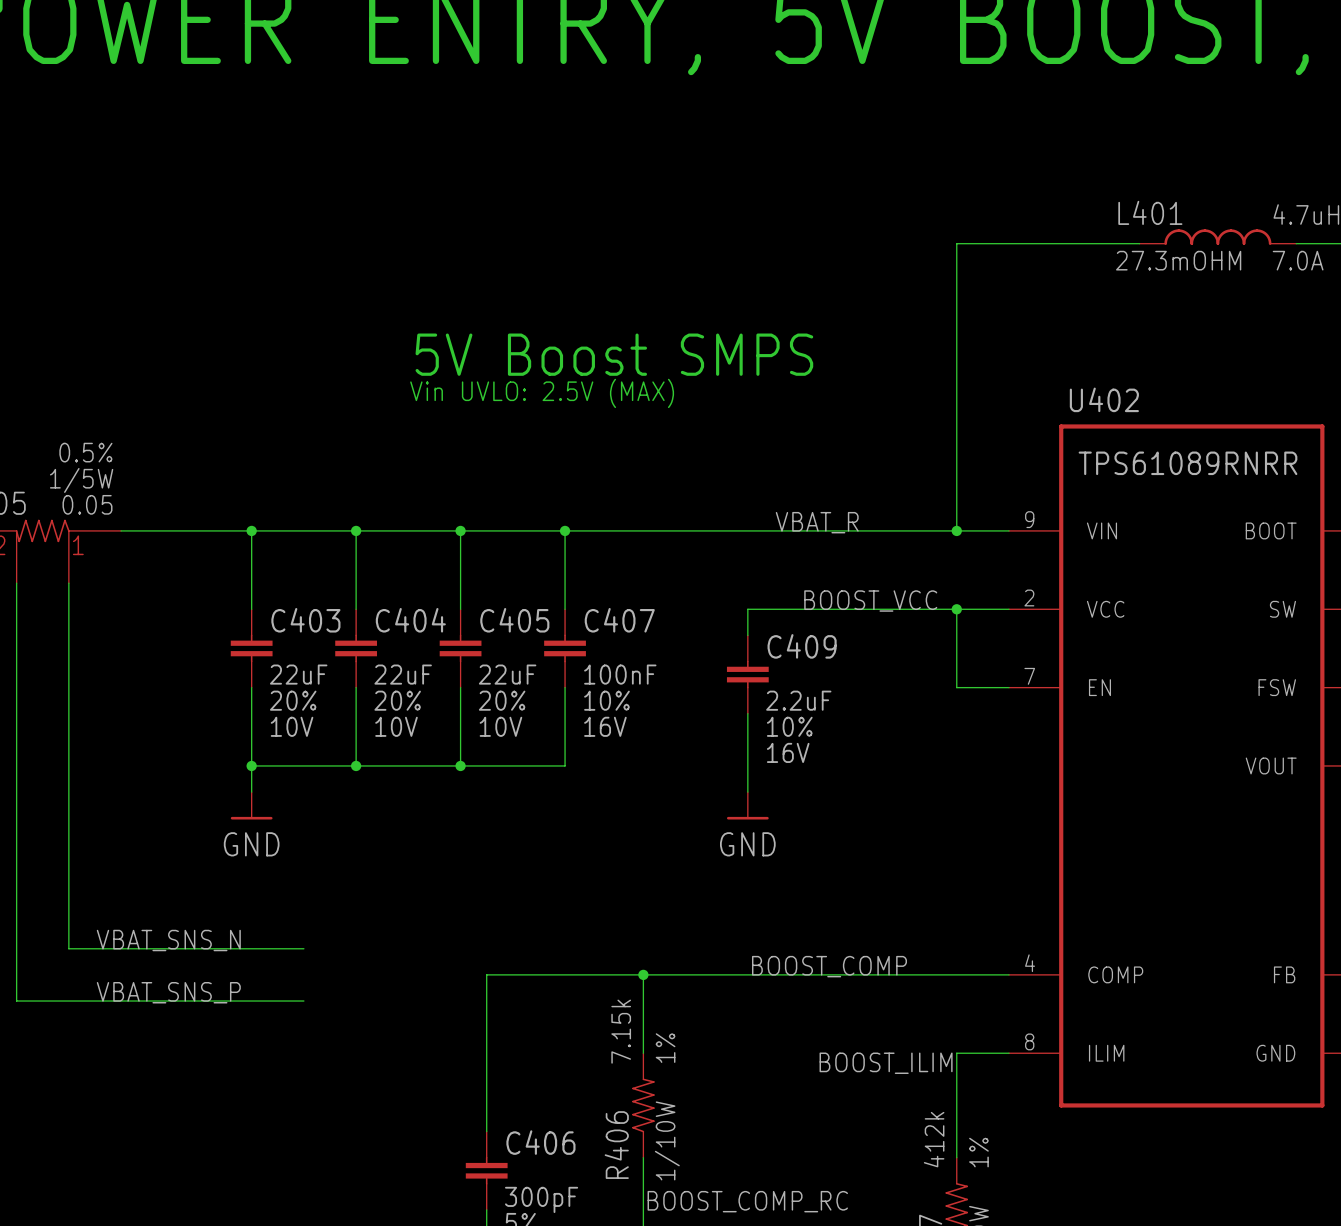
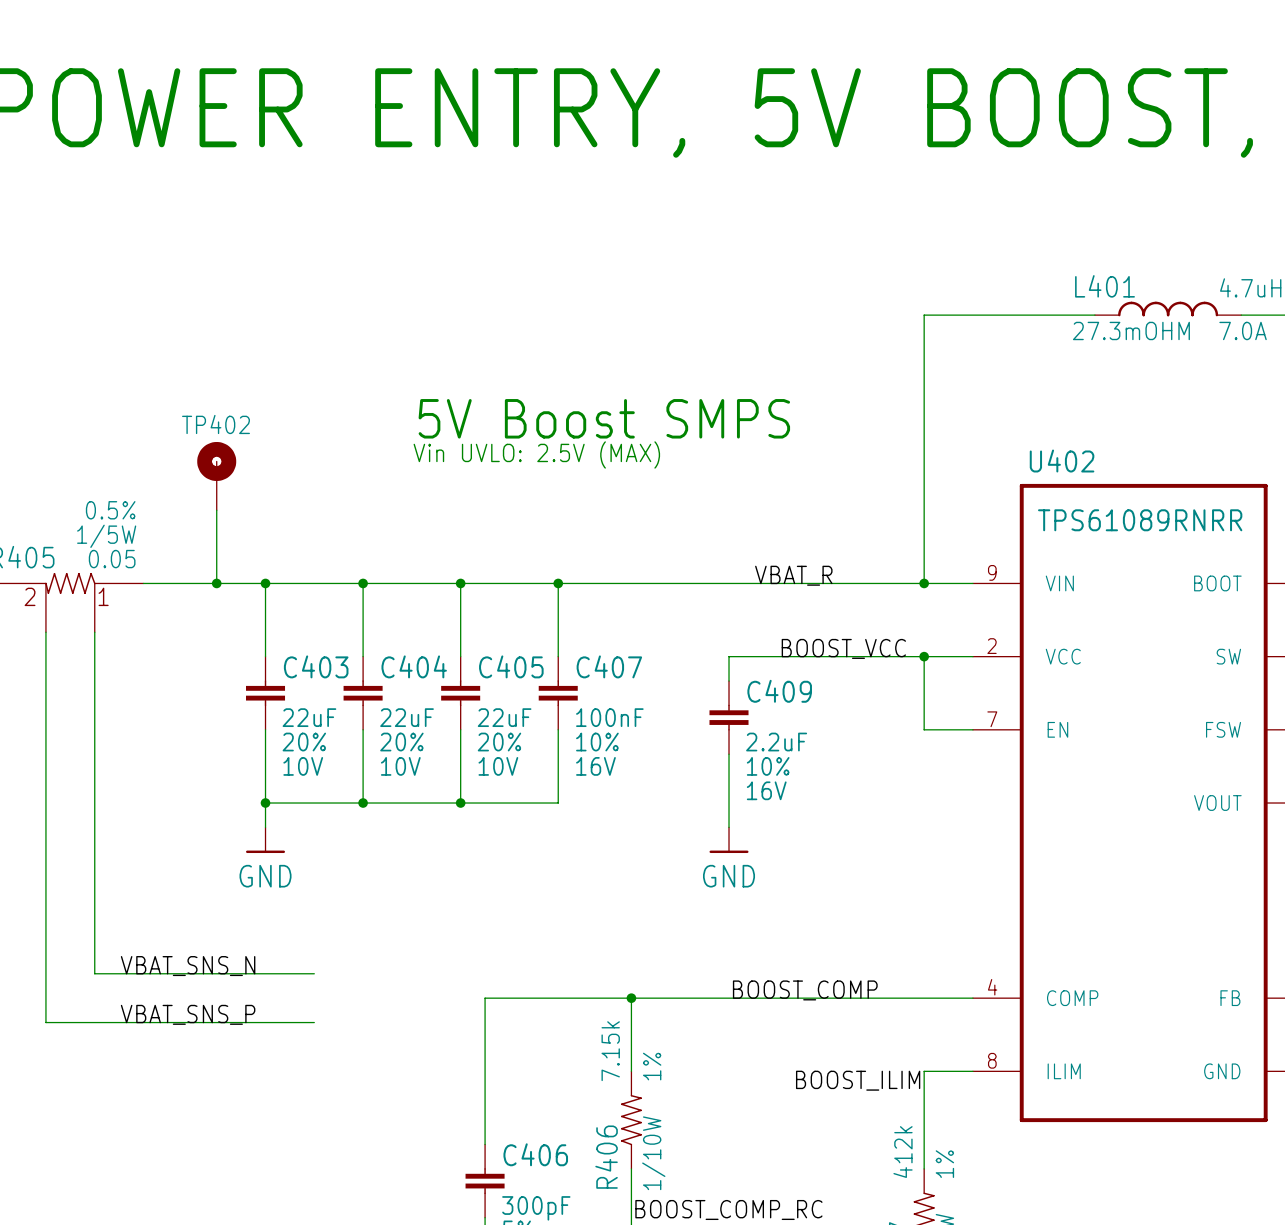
TP402: none -> (216, 476)
wire: none -> (216, 510) (216, 583)
junction: none -> (216, 583)

